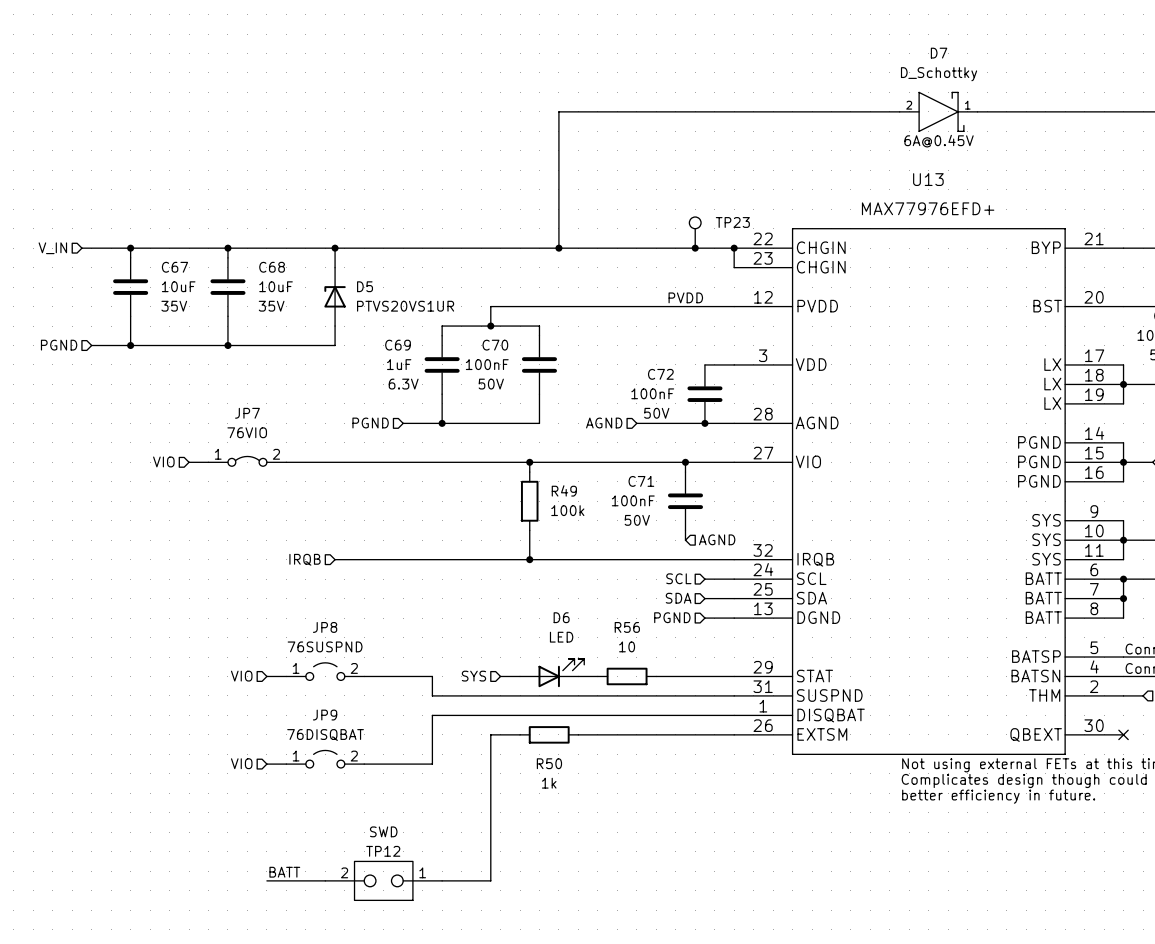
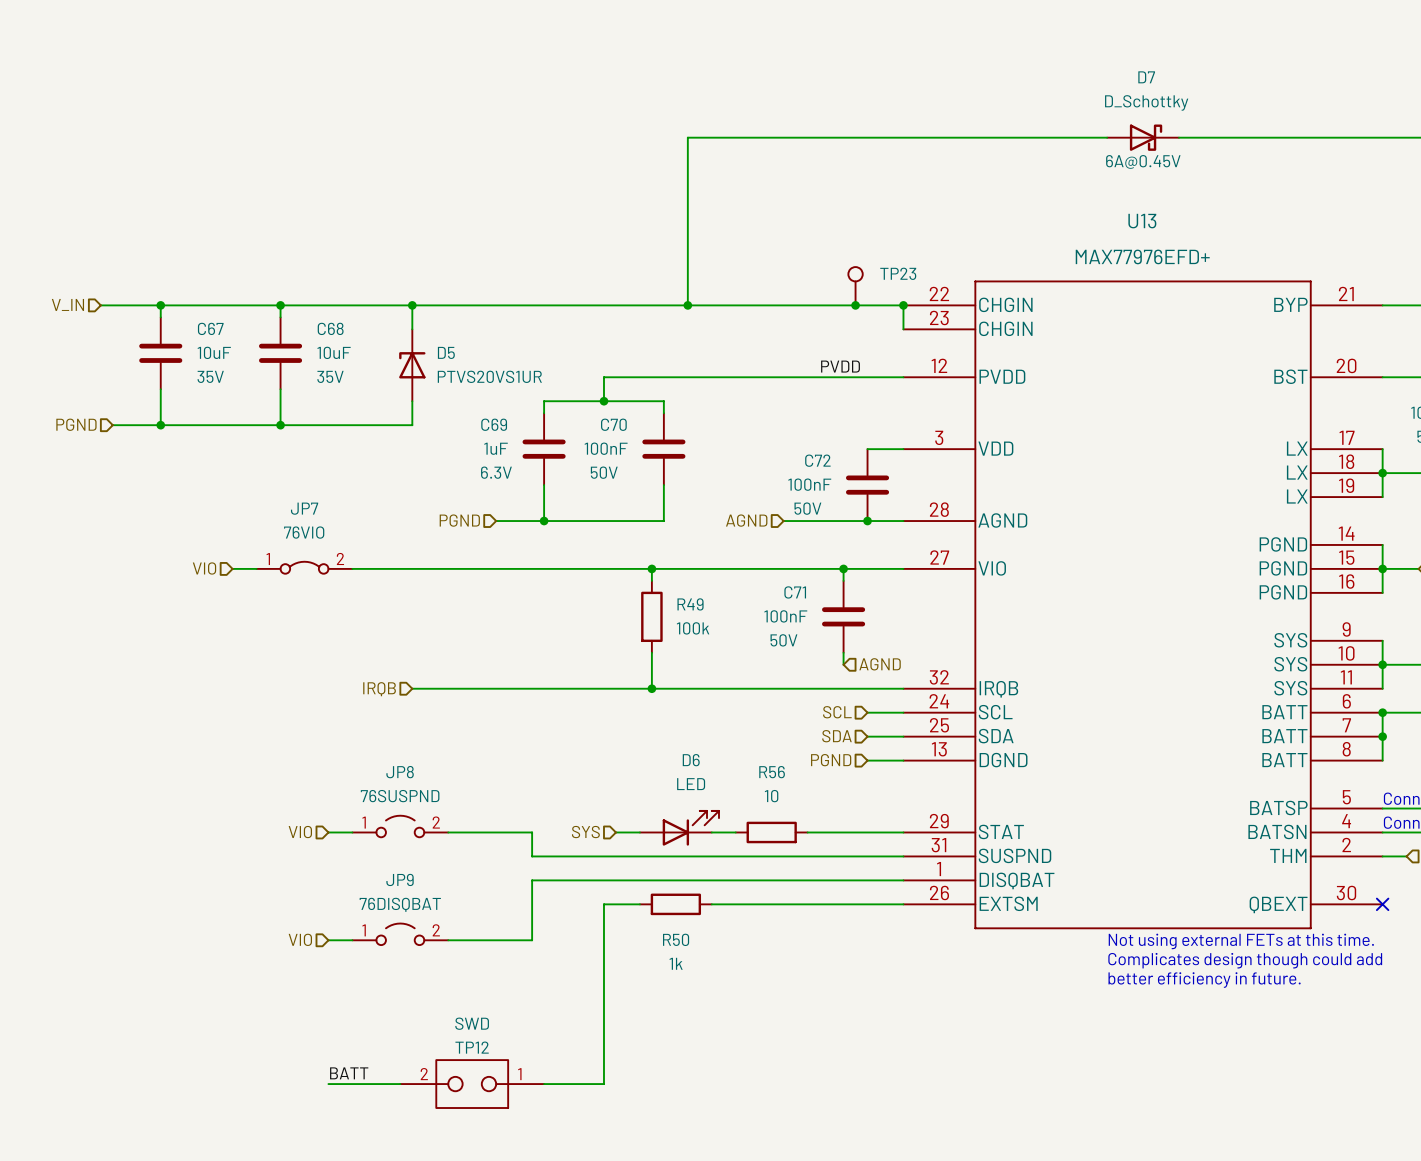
D7 symbol: [899, 92, 978, 132] -> [1107, 124, 1179, 151]

